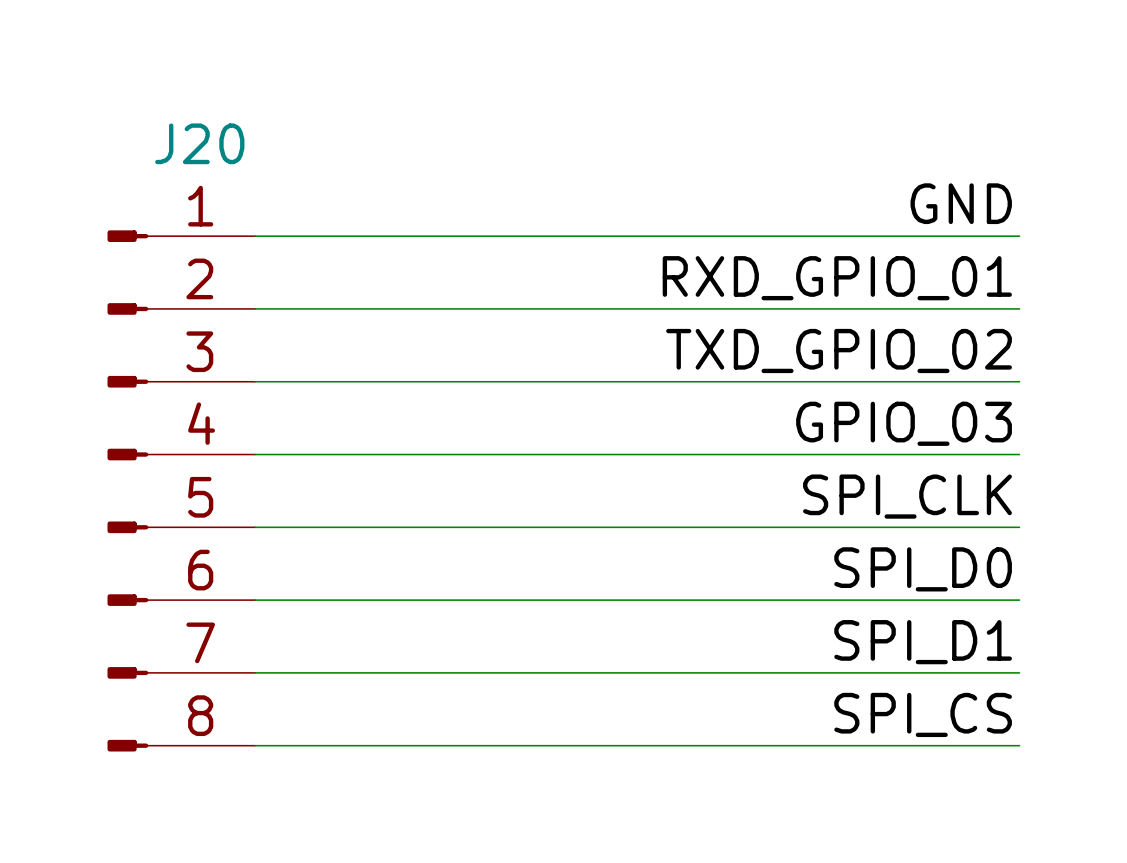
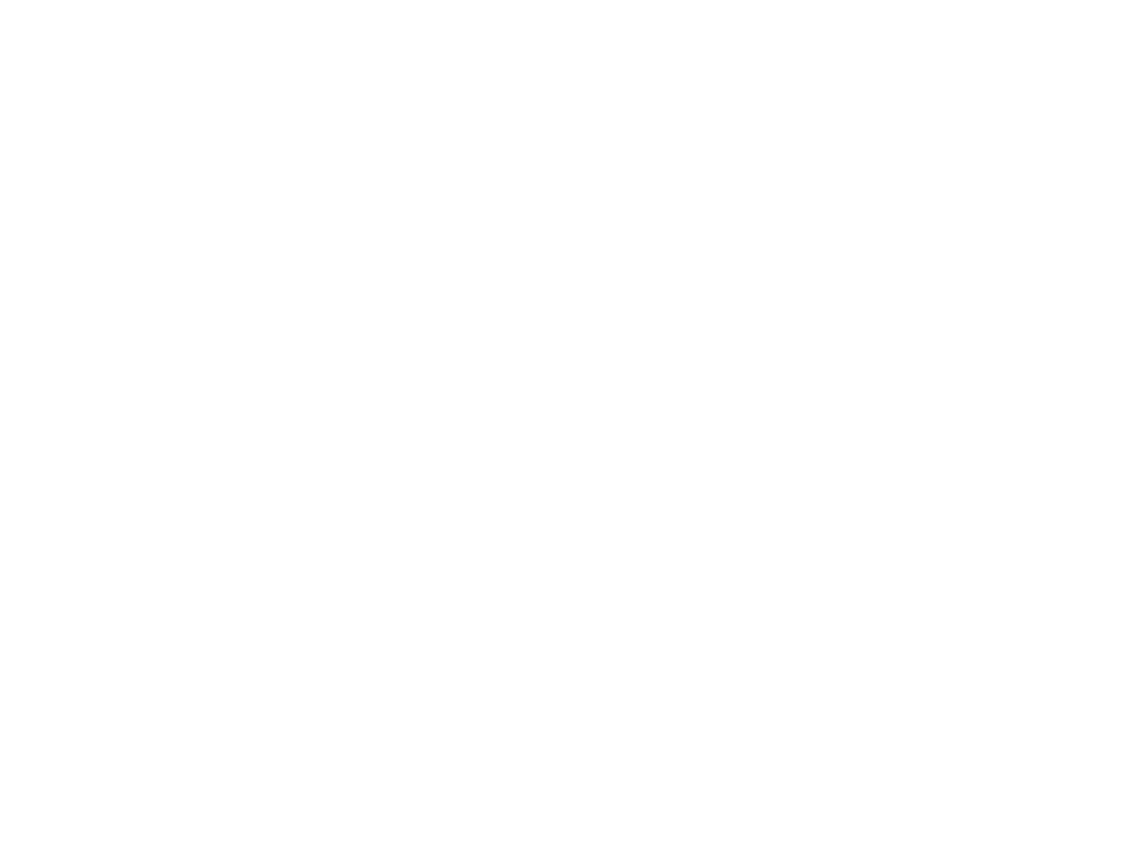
label: GND (961, 203) -> none
wire: (255, 236) (1019, 236) -> none
label: RXD_GPIO_01 (837, 278) -> none
wire: (255, 308) (1019, 308) -> none
label: TXD_GPIO_02 (839, 350) -> none
wire: (255, 381) (1019, 381) -> none
label: GPIO_03 (904, 423) -> none
wire: (255, 454) (1019, 454) -> none
J20: (181, 490) -> none
label: SPI_CLK (907, 496) -> none
wire: (255, 527) (1019, 527) -> none
label: SPI_D0 (923, 569) -> none
wire: (255, 600) (1019, 600) -> none
label: SPI_D1 (923, 642) -> none
wire: (255, 672) (1019, 672) -> none
label: SPI_CS (923, 714) -> none
wire: (255, 745) (1019, 745) -> none

